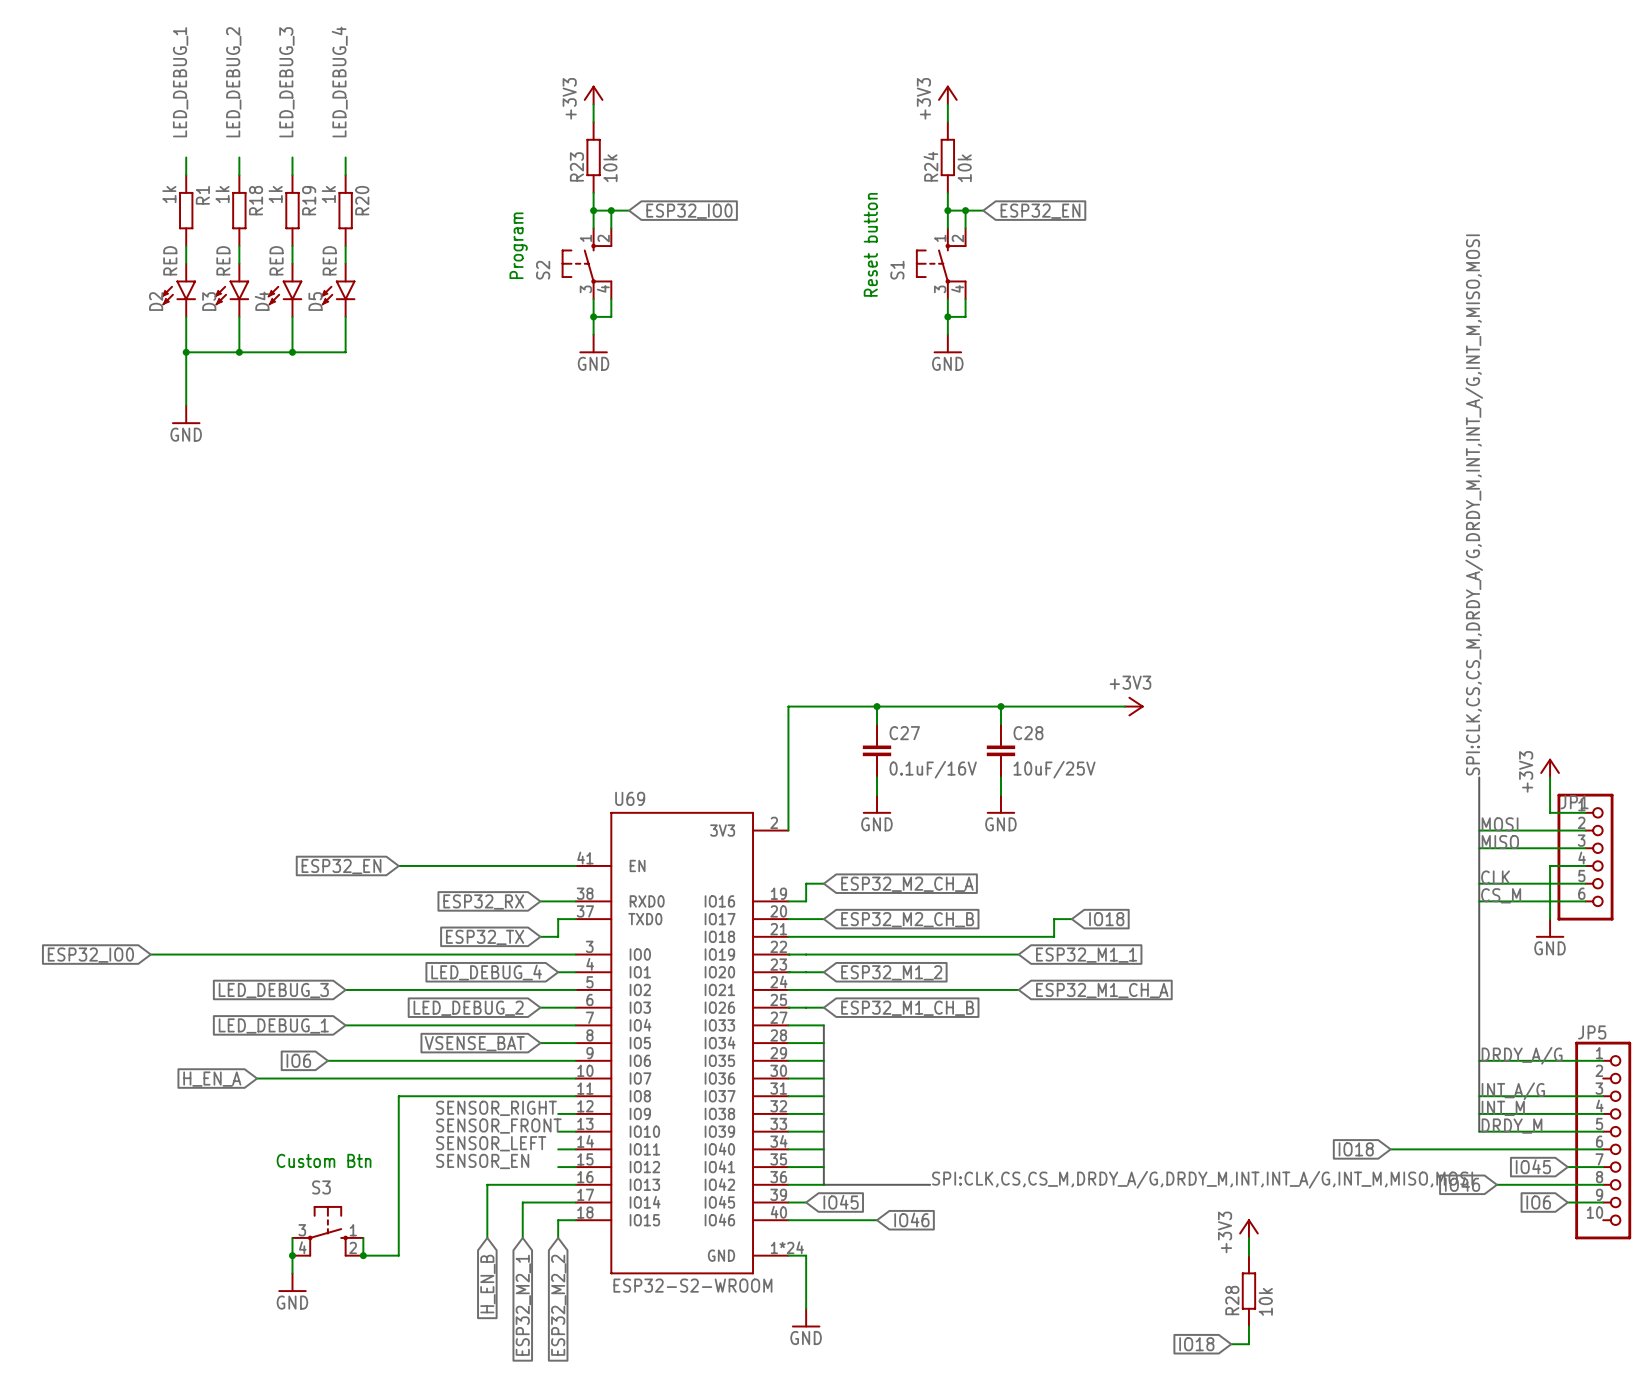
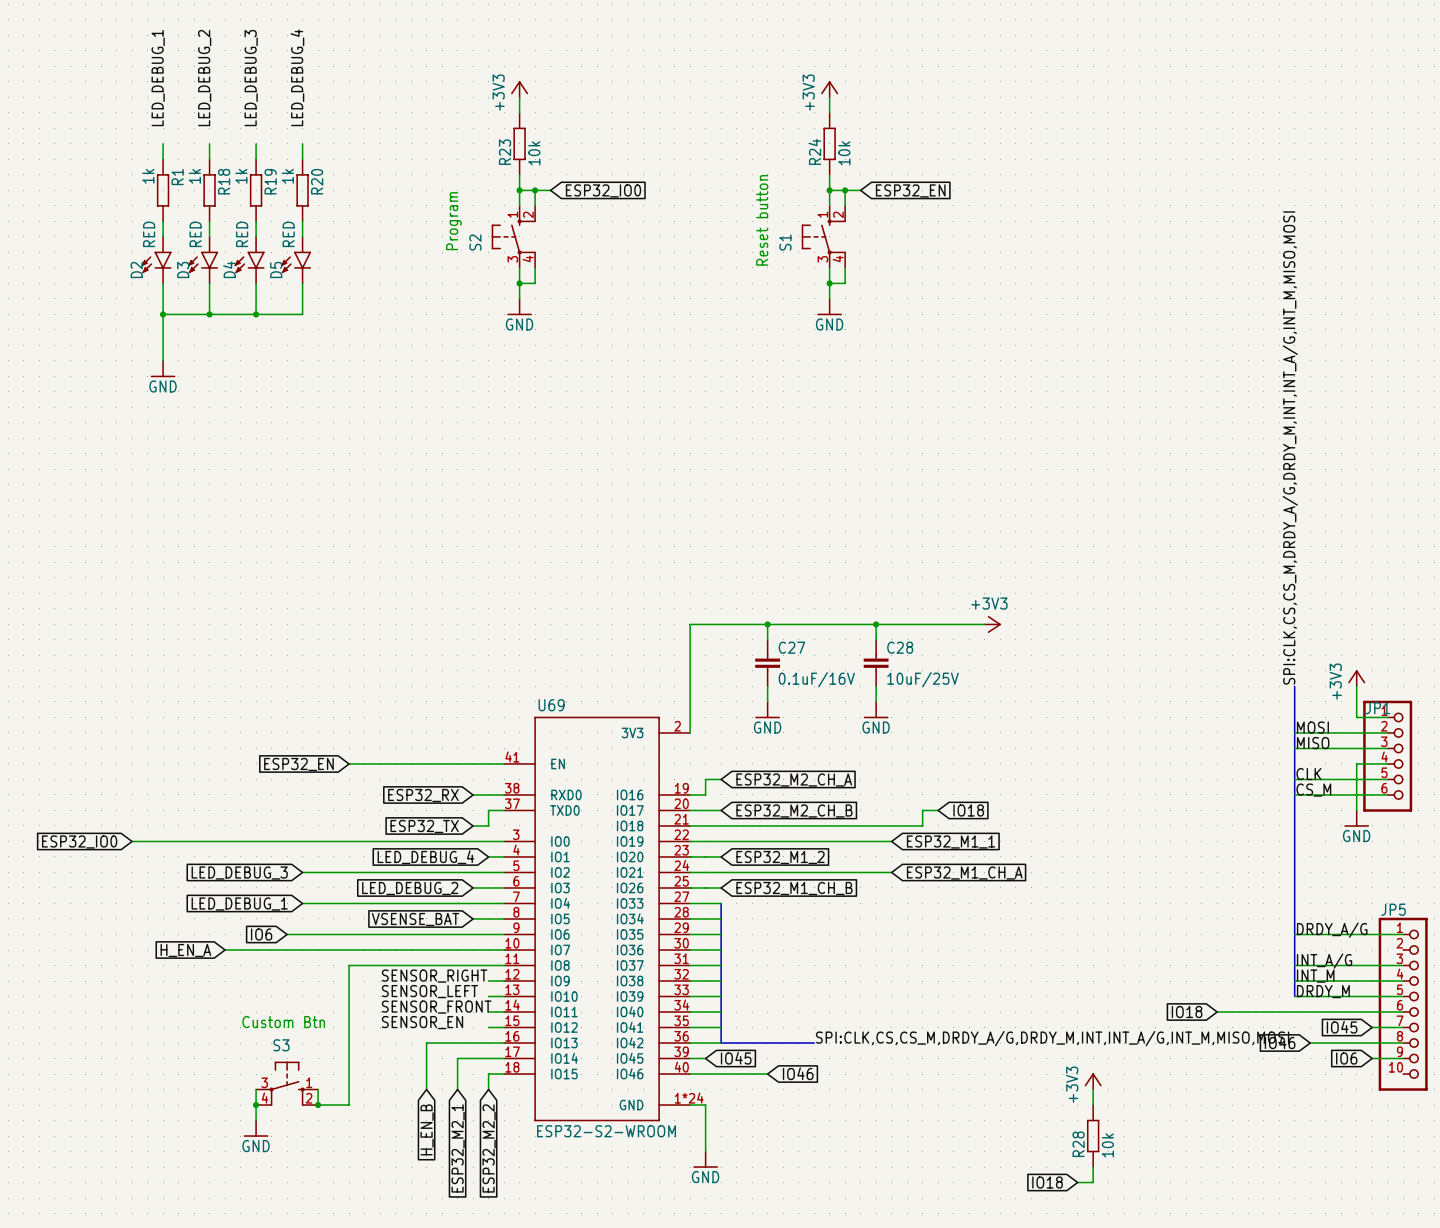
label: SENSOR_FRONT (498, 1126) -> SENSOR_LEFT (429, 991)
label: SENSOR_LEFT (491, 1143) -> SENSOR_FRONT (436, 1007)

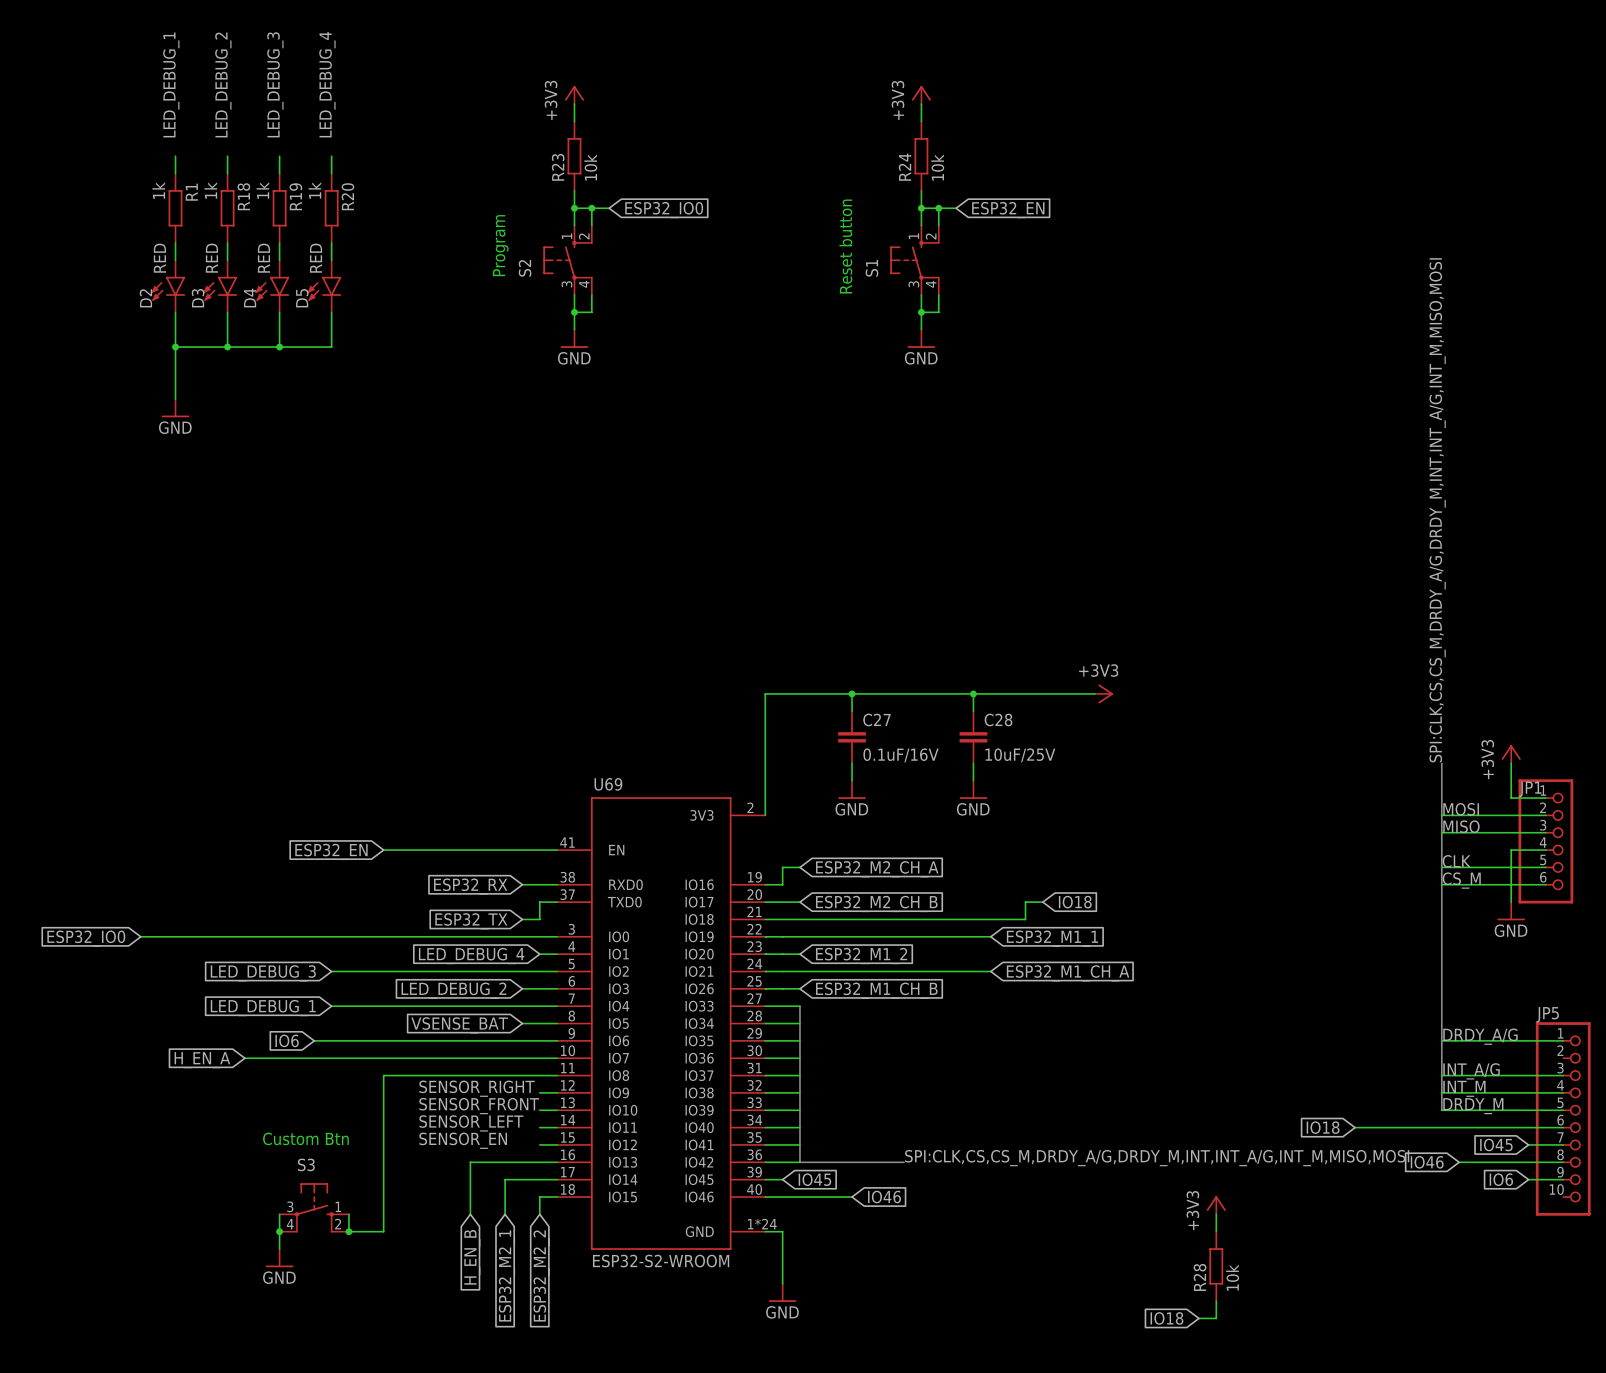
label: SENSOR_LEFT (429, 991) -> SENSOR_FRONT (479, 1106)
label: SENSOR_FRONT (436, 1007) -> SENSOR_LEFT (471, 1123)

